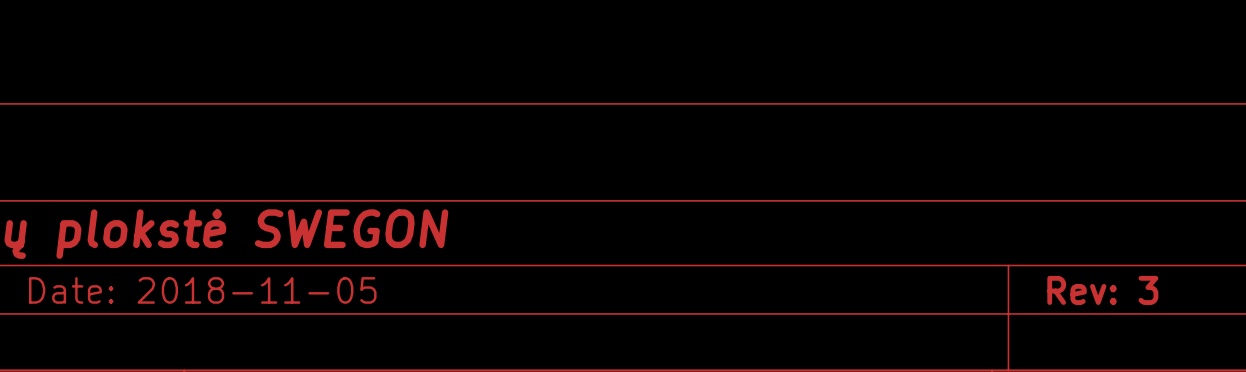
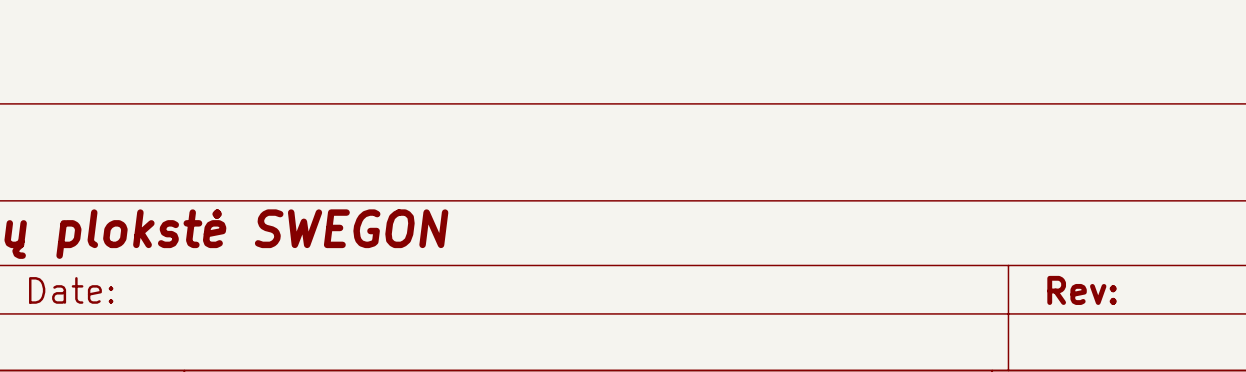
title block: Date: 2018-11-05 (202, 290) -> Date: (71, 290)
title block: Rev: 3 (1102, 290) -> Rev: (1082, 290)

